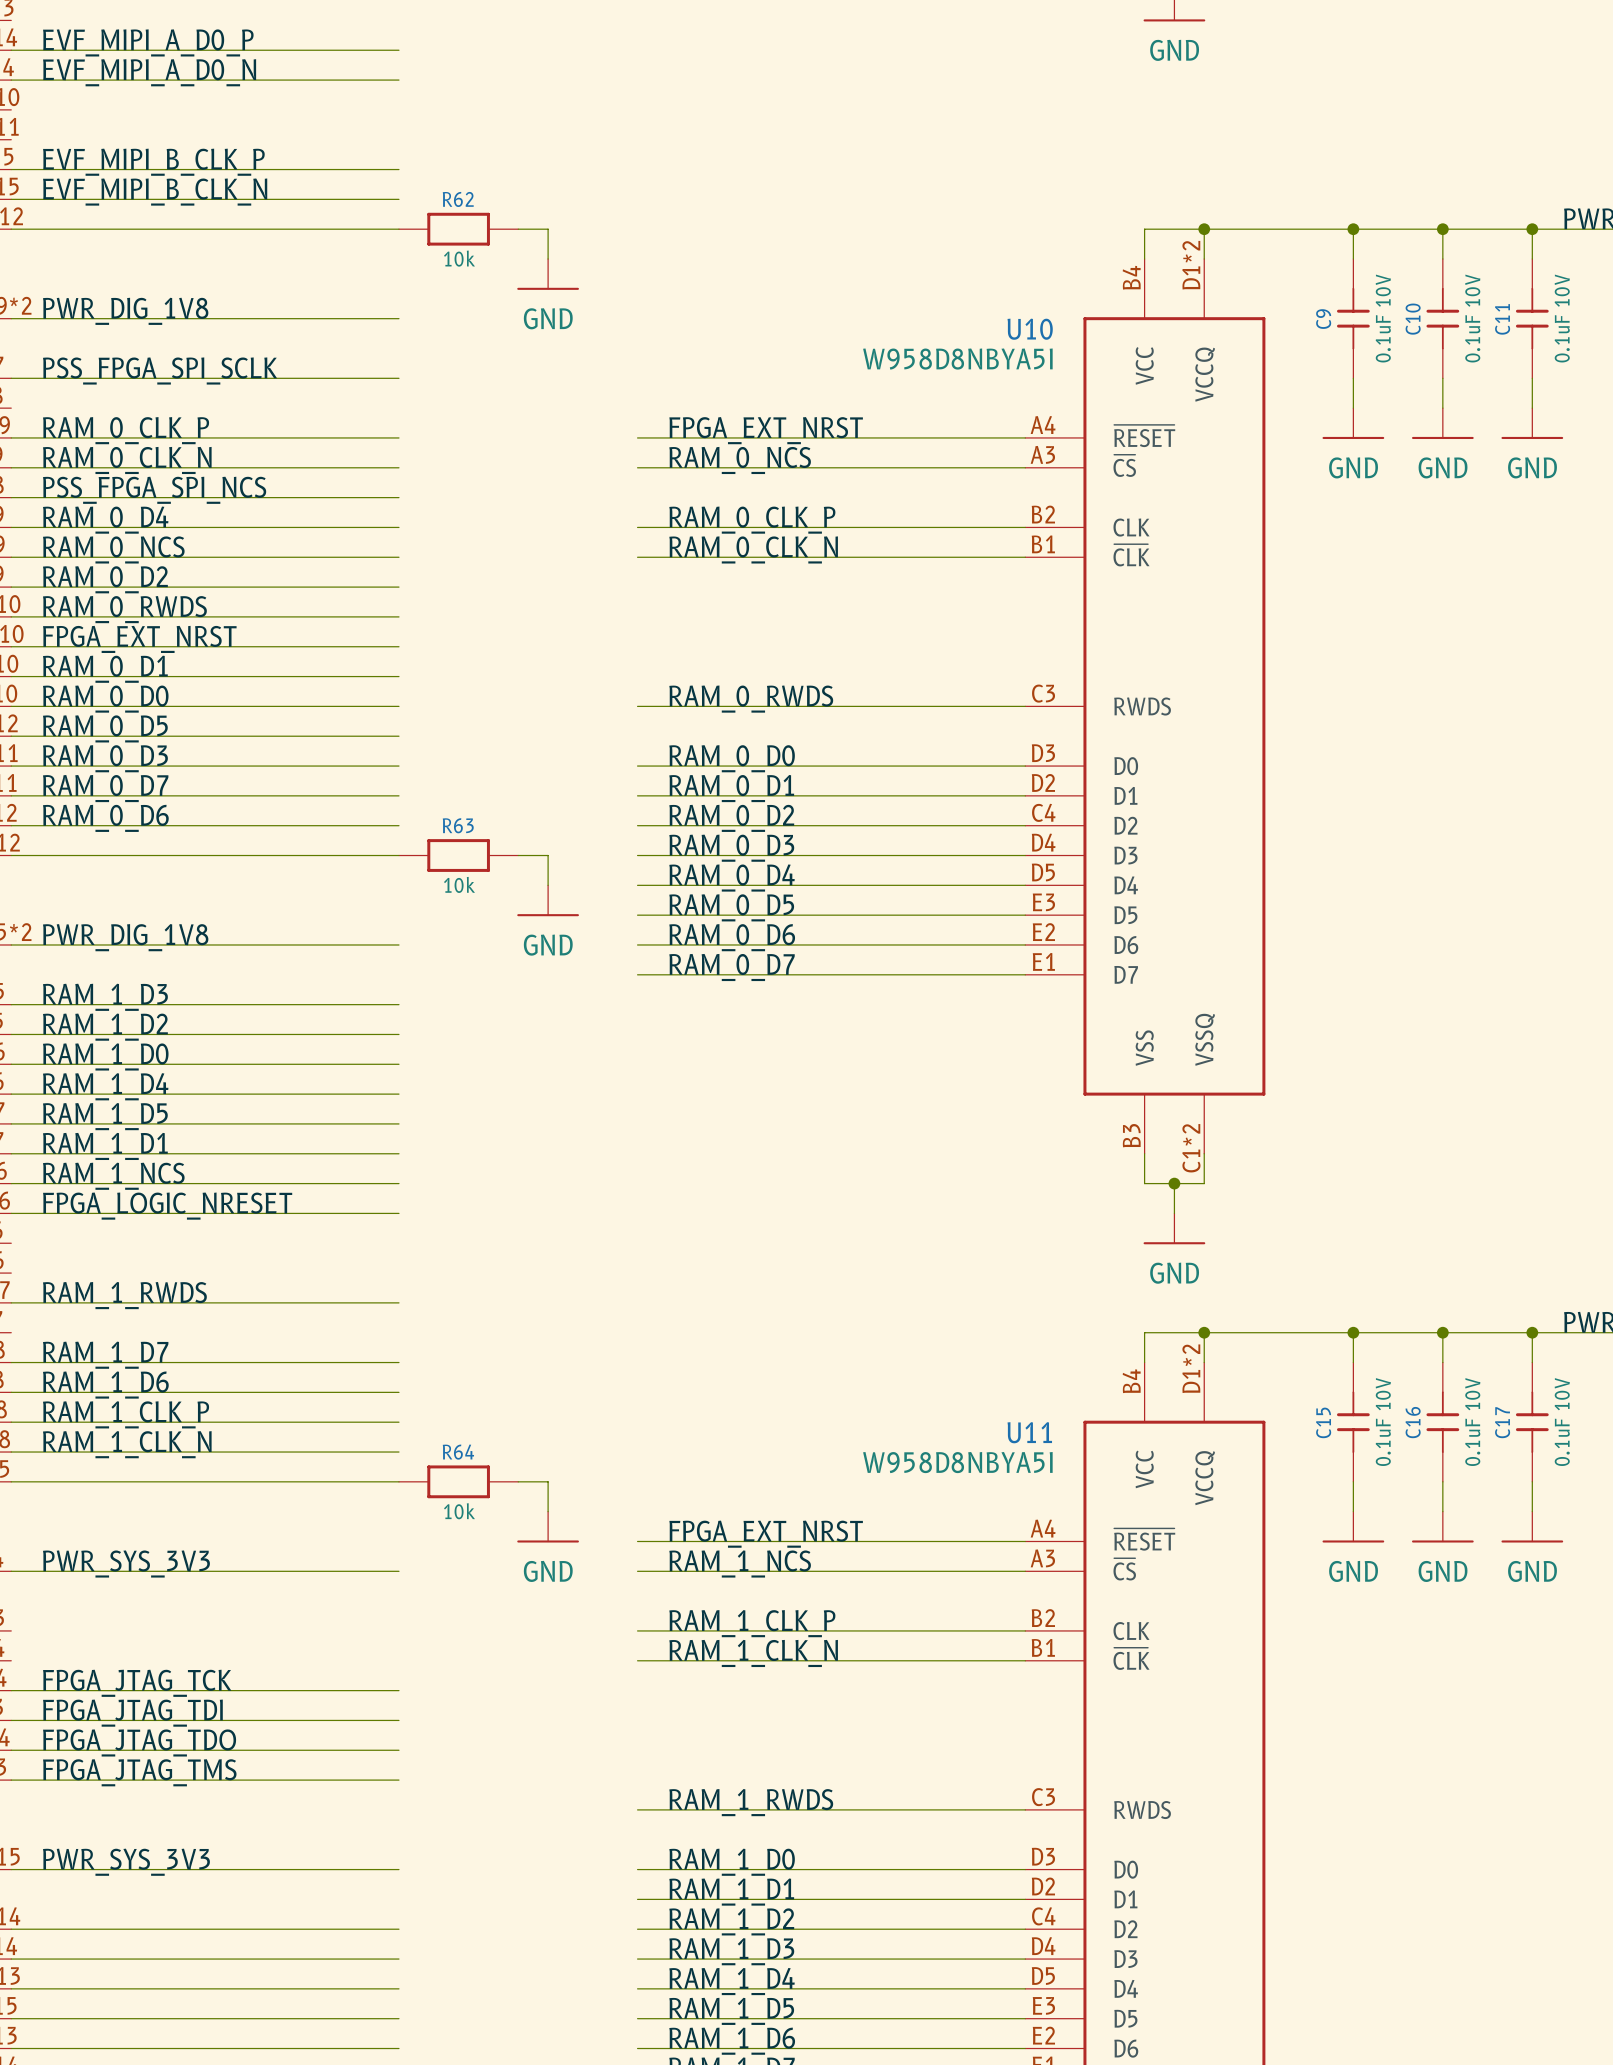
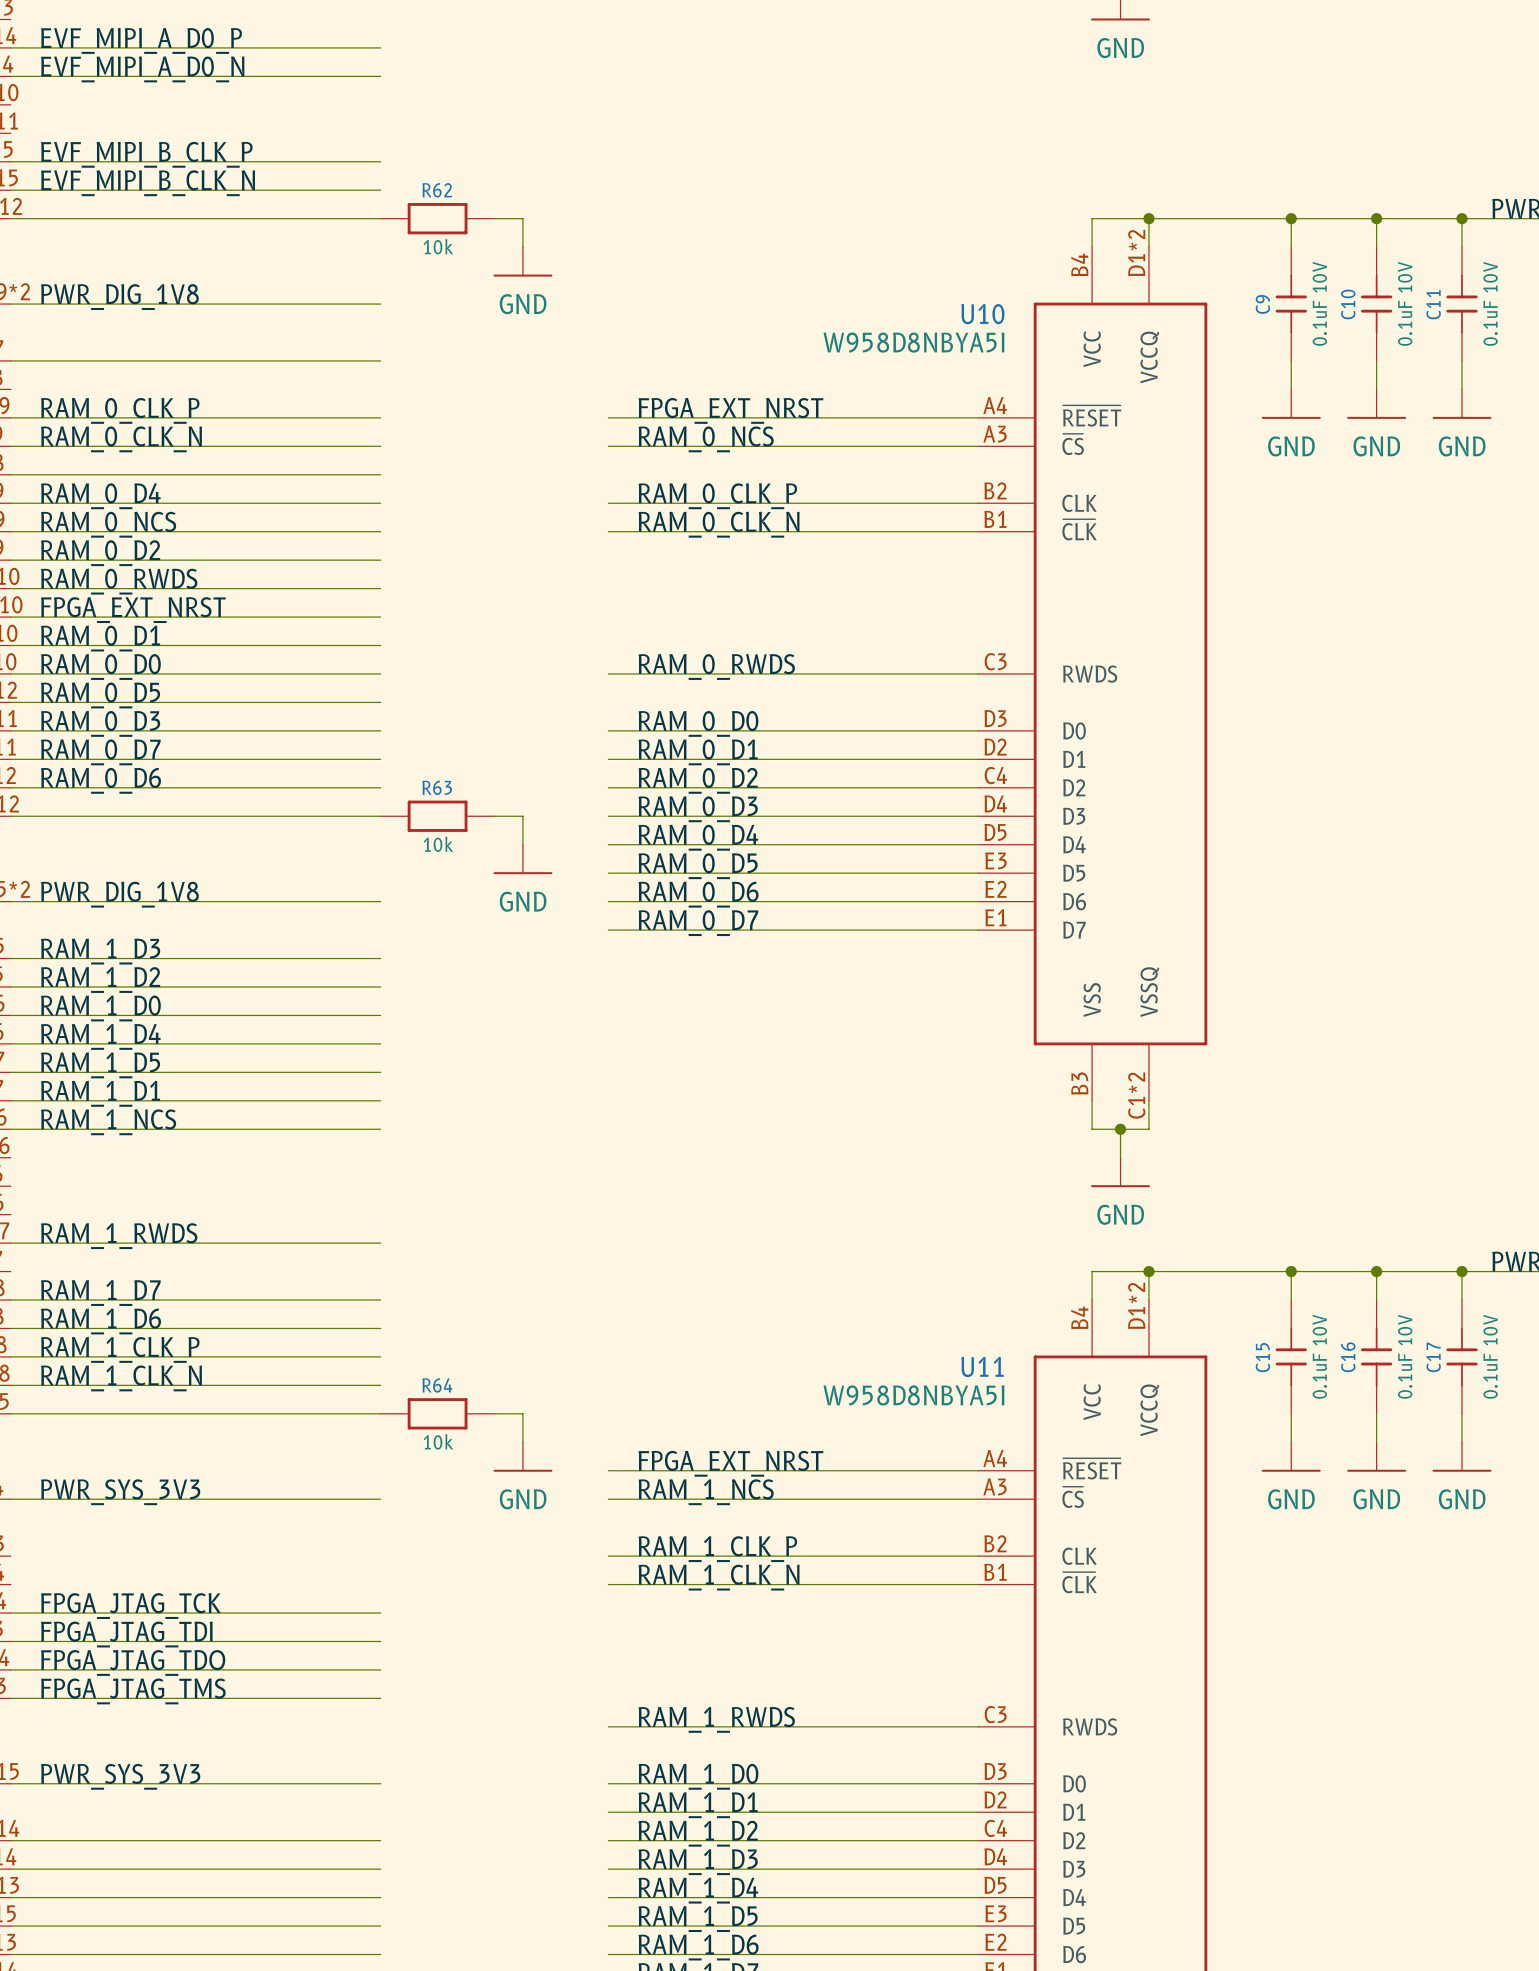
label: PSS_FPGA_SPI_SCLK (160, 371) -> none
label: PSS_FPGA_SPI_NCS (154, 490) -> none
label: FPGA_LOGIC_NRESET (167, 1206) -> none
wire: (11, 1213) (398, 1213) -> none

